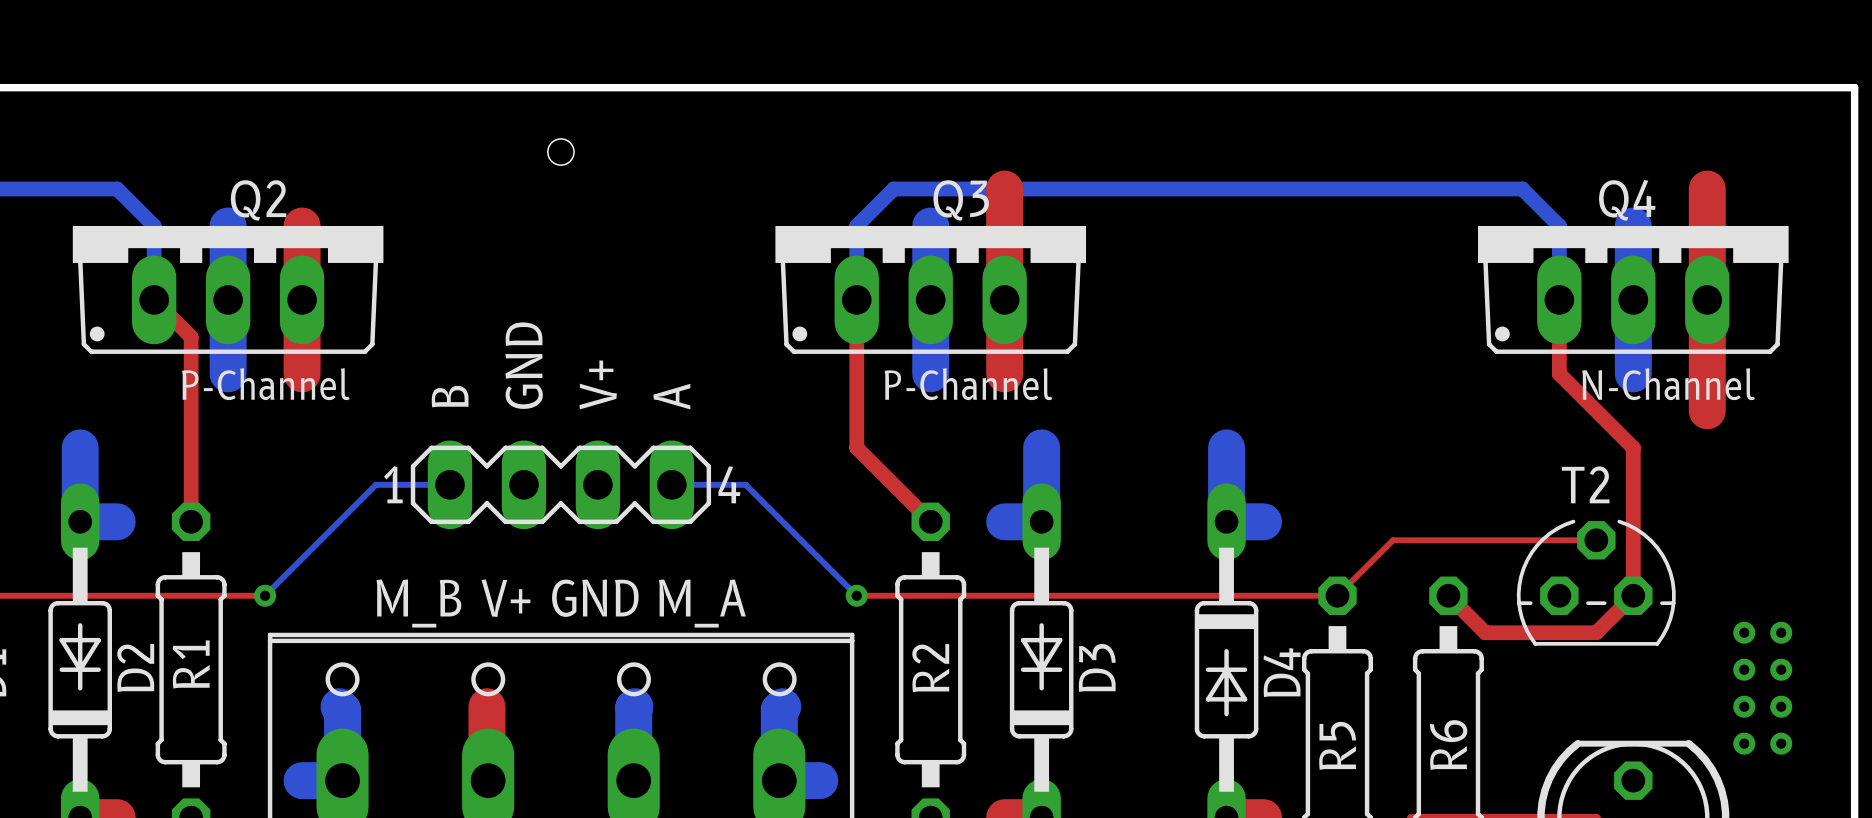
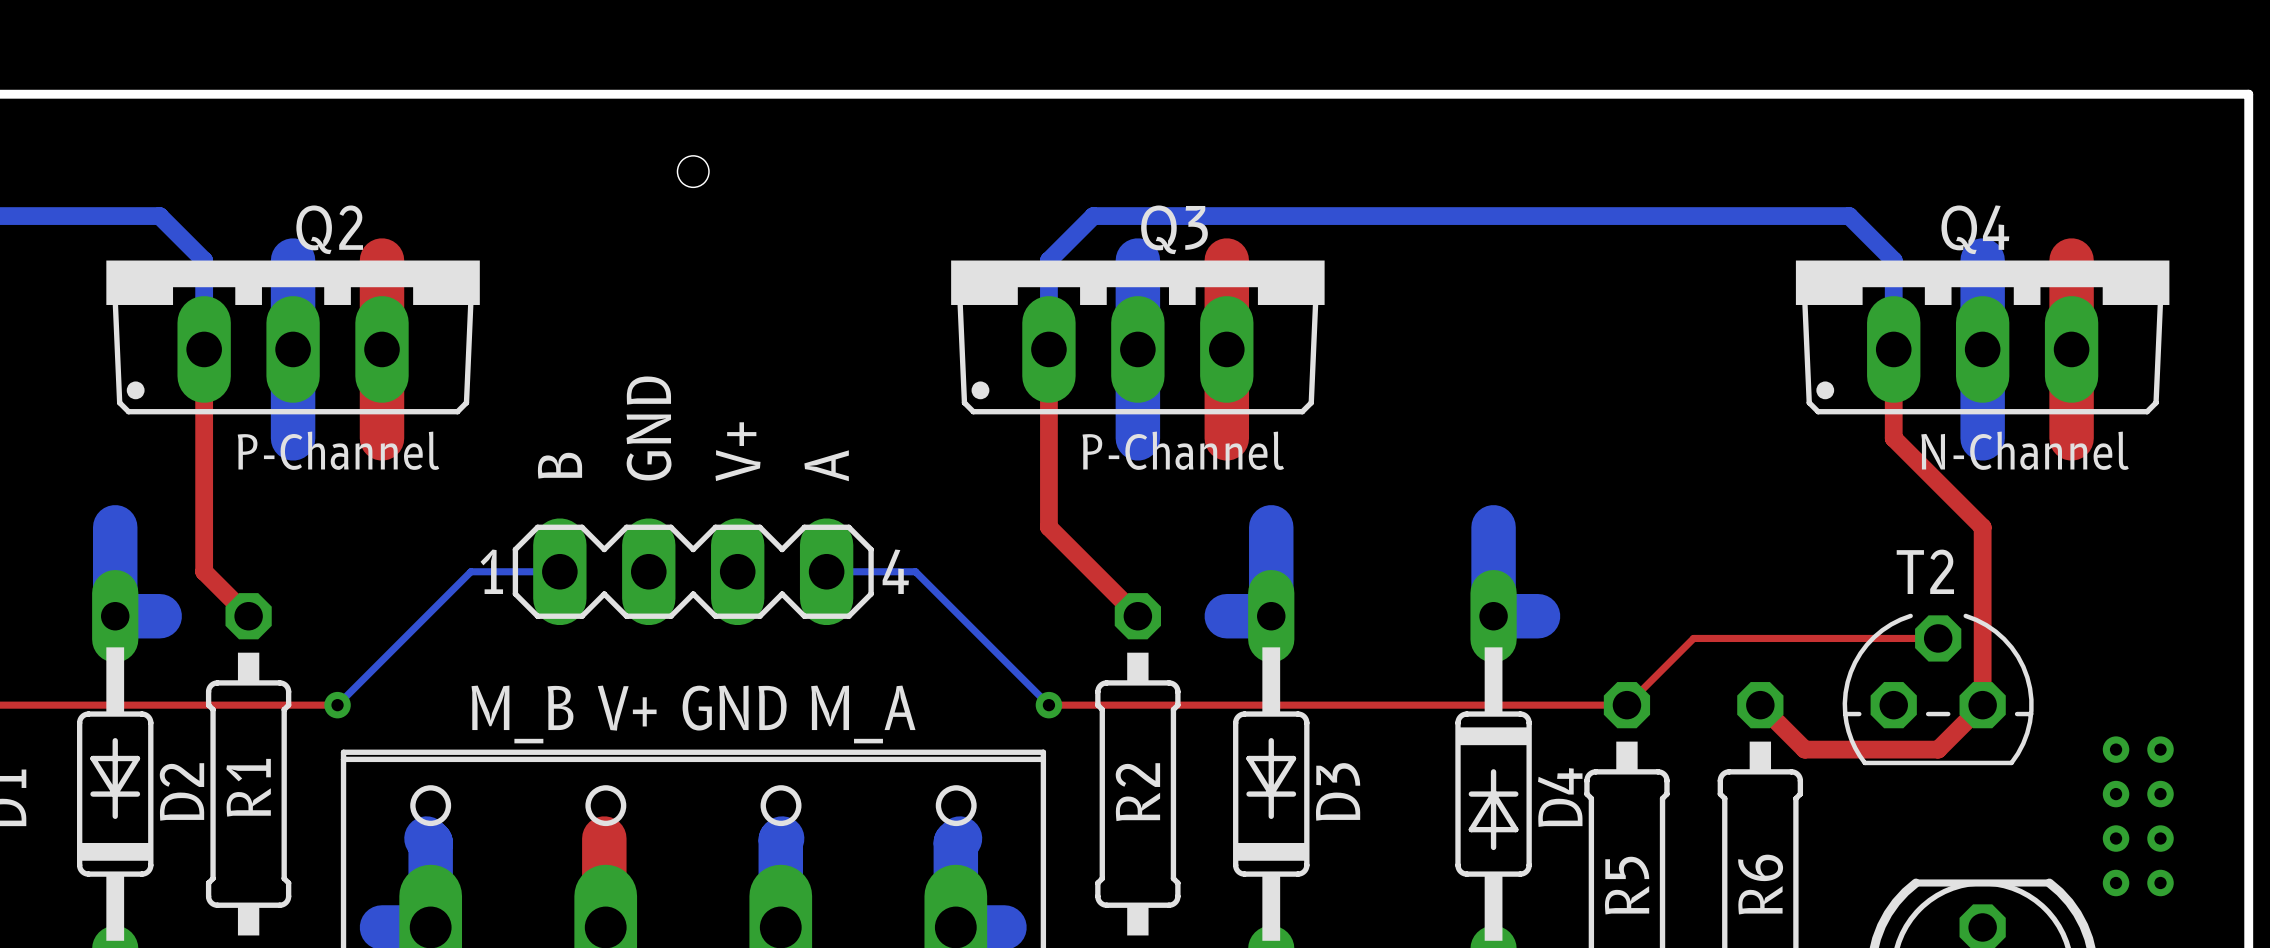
top track: (1004, 189) (1004, 225) -> none
top track: (1707, 189) (1707, 225) -> none
top track: (154, 299) (191, 336) (191, 521) -> (204, 349) (204, 571) (248, 616)
top track: (1707, 373) (1707, 410) -> none

